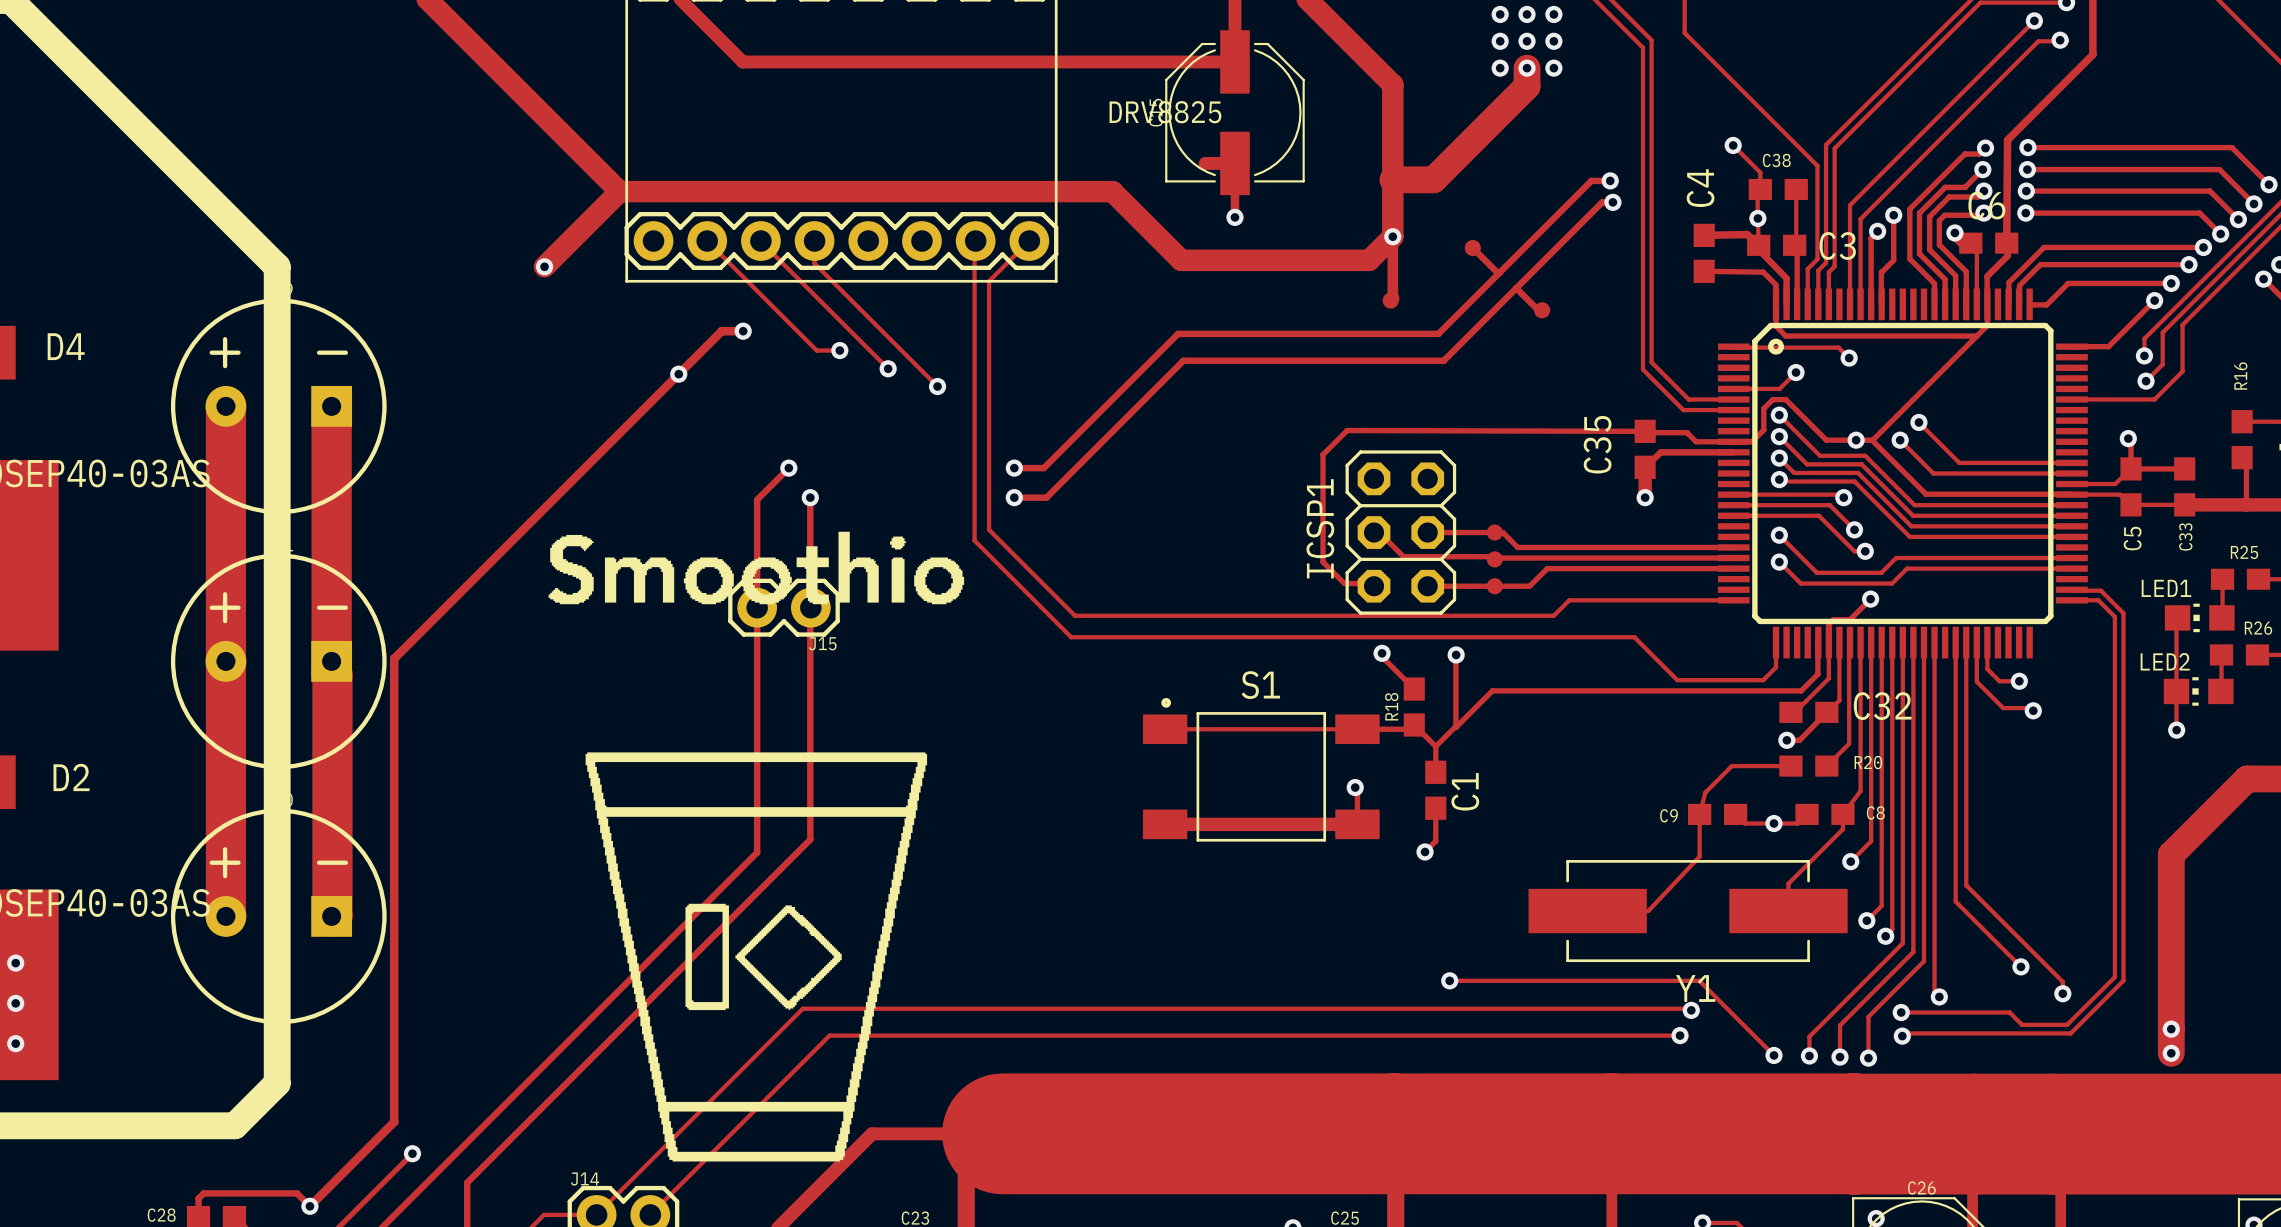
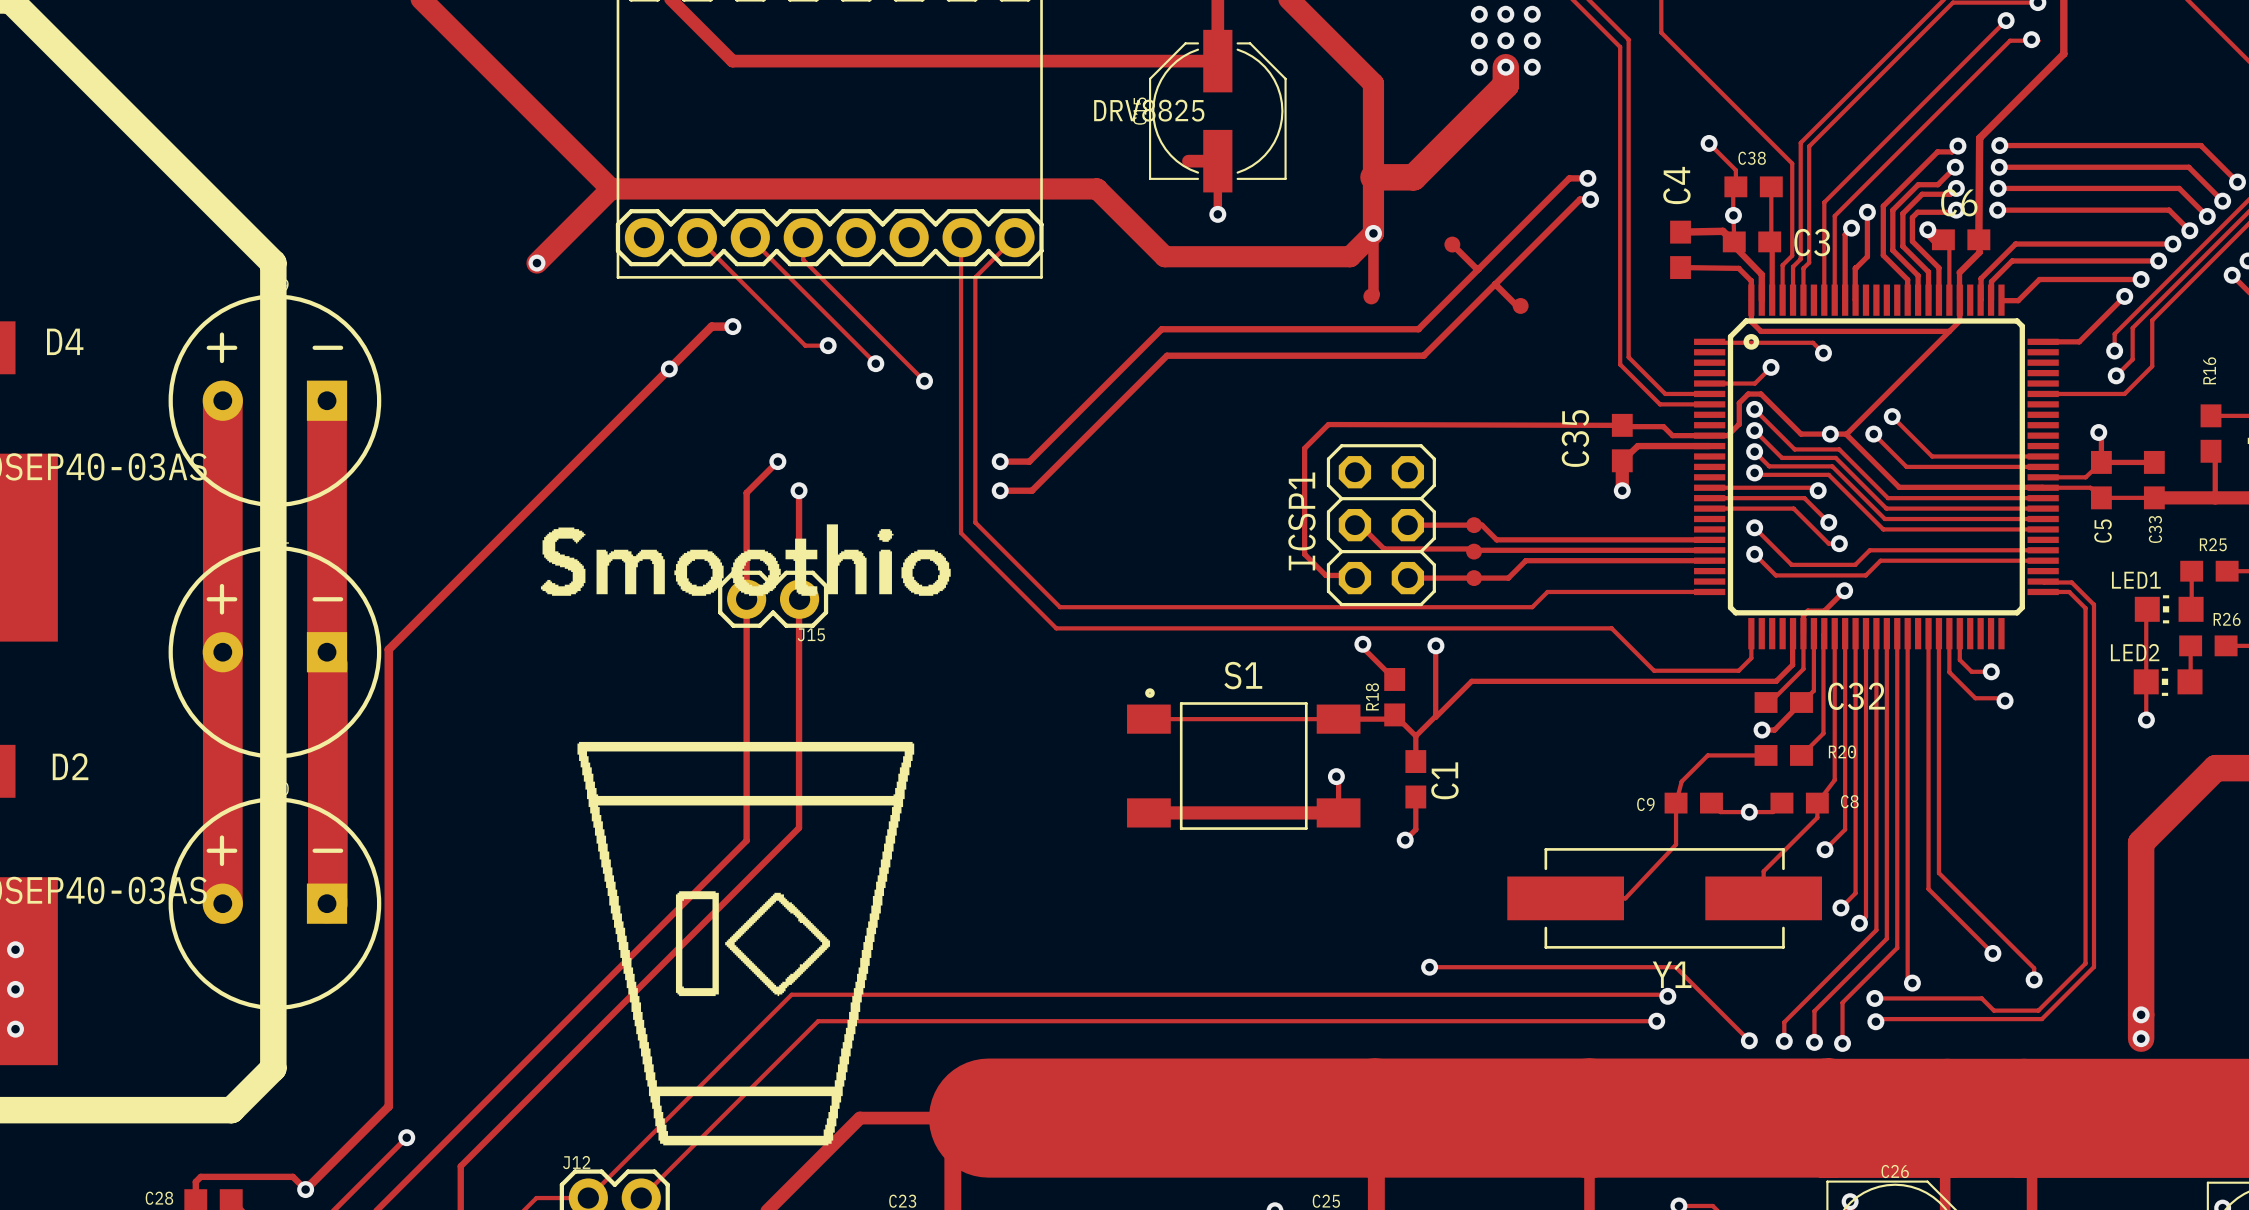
J14 name: J14 (585, 1179) -> J12 (576, 1162)

